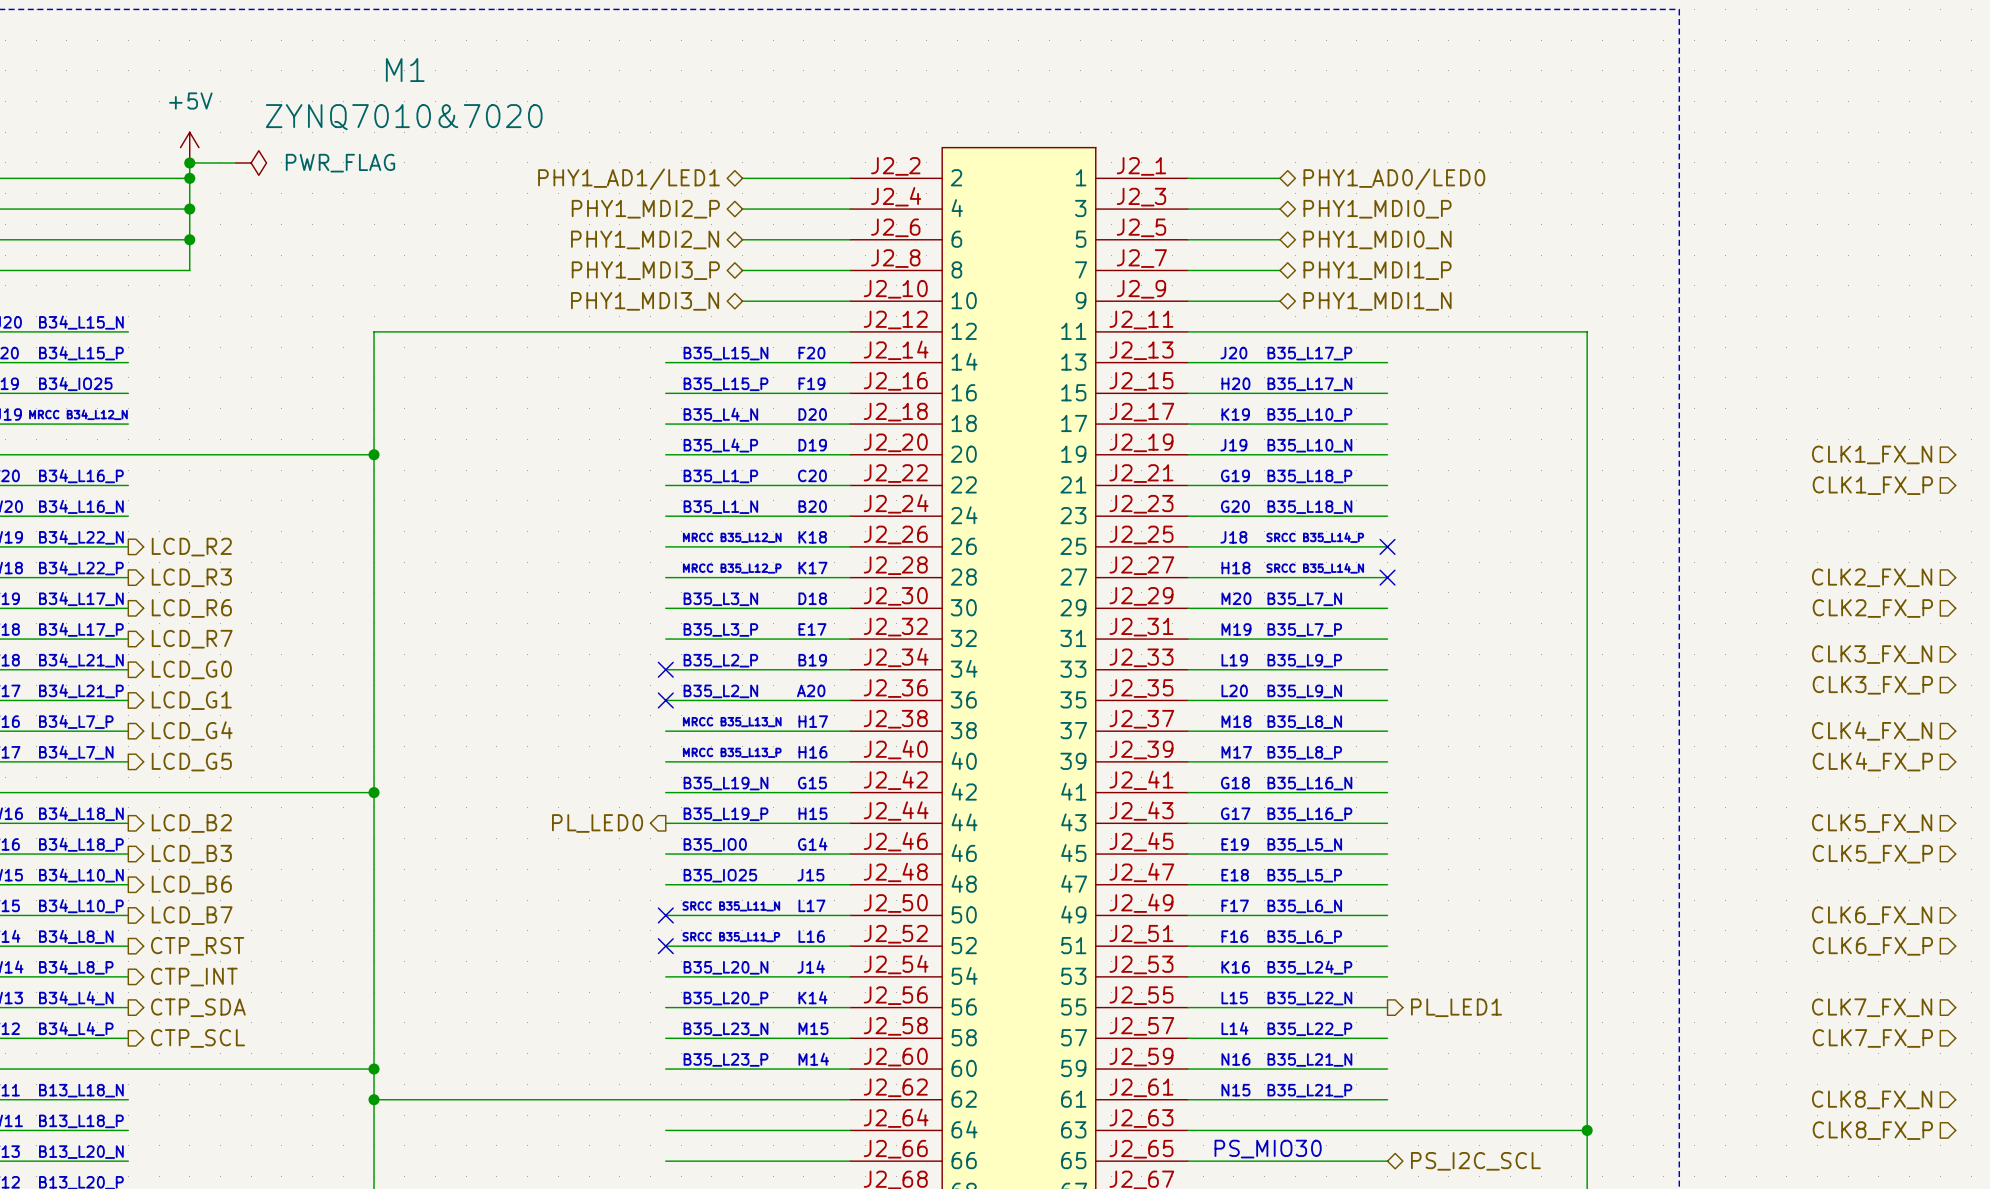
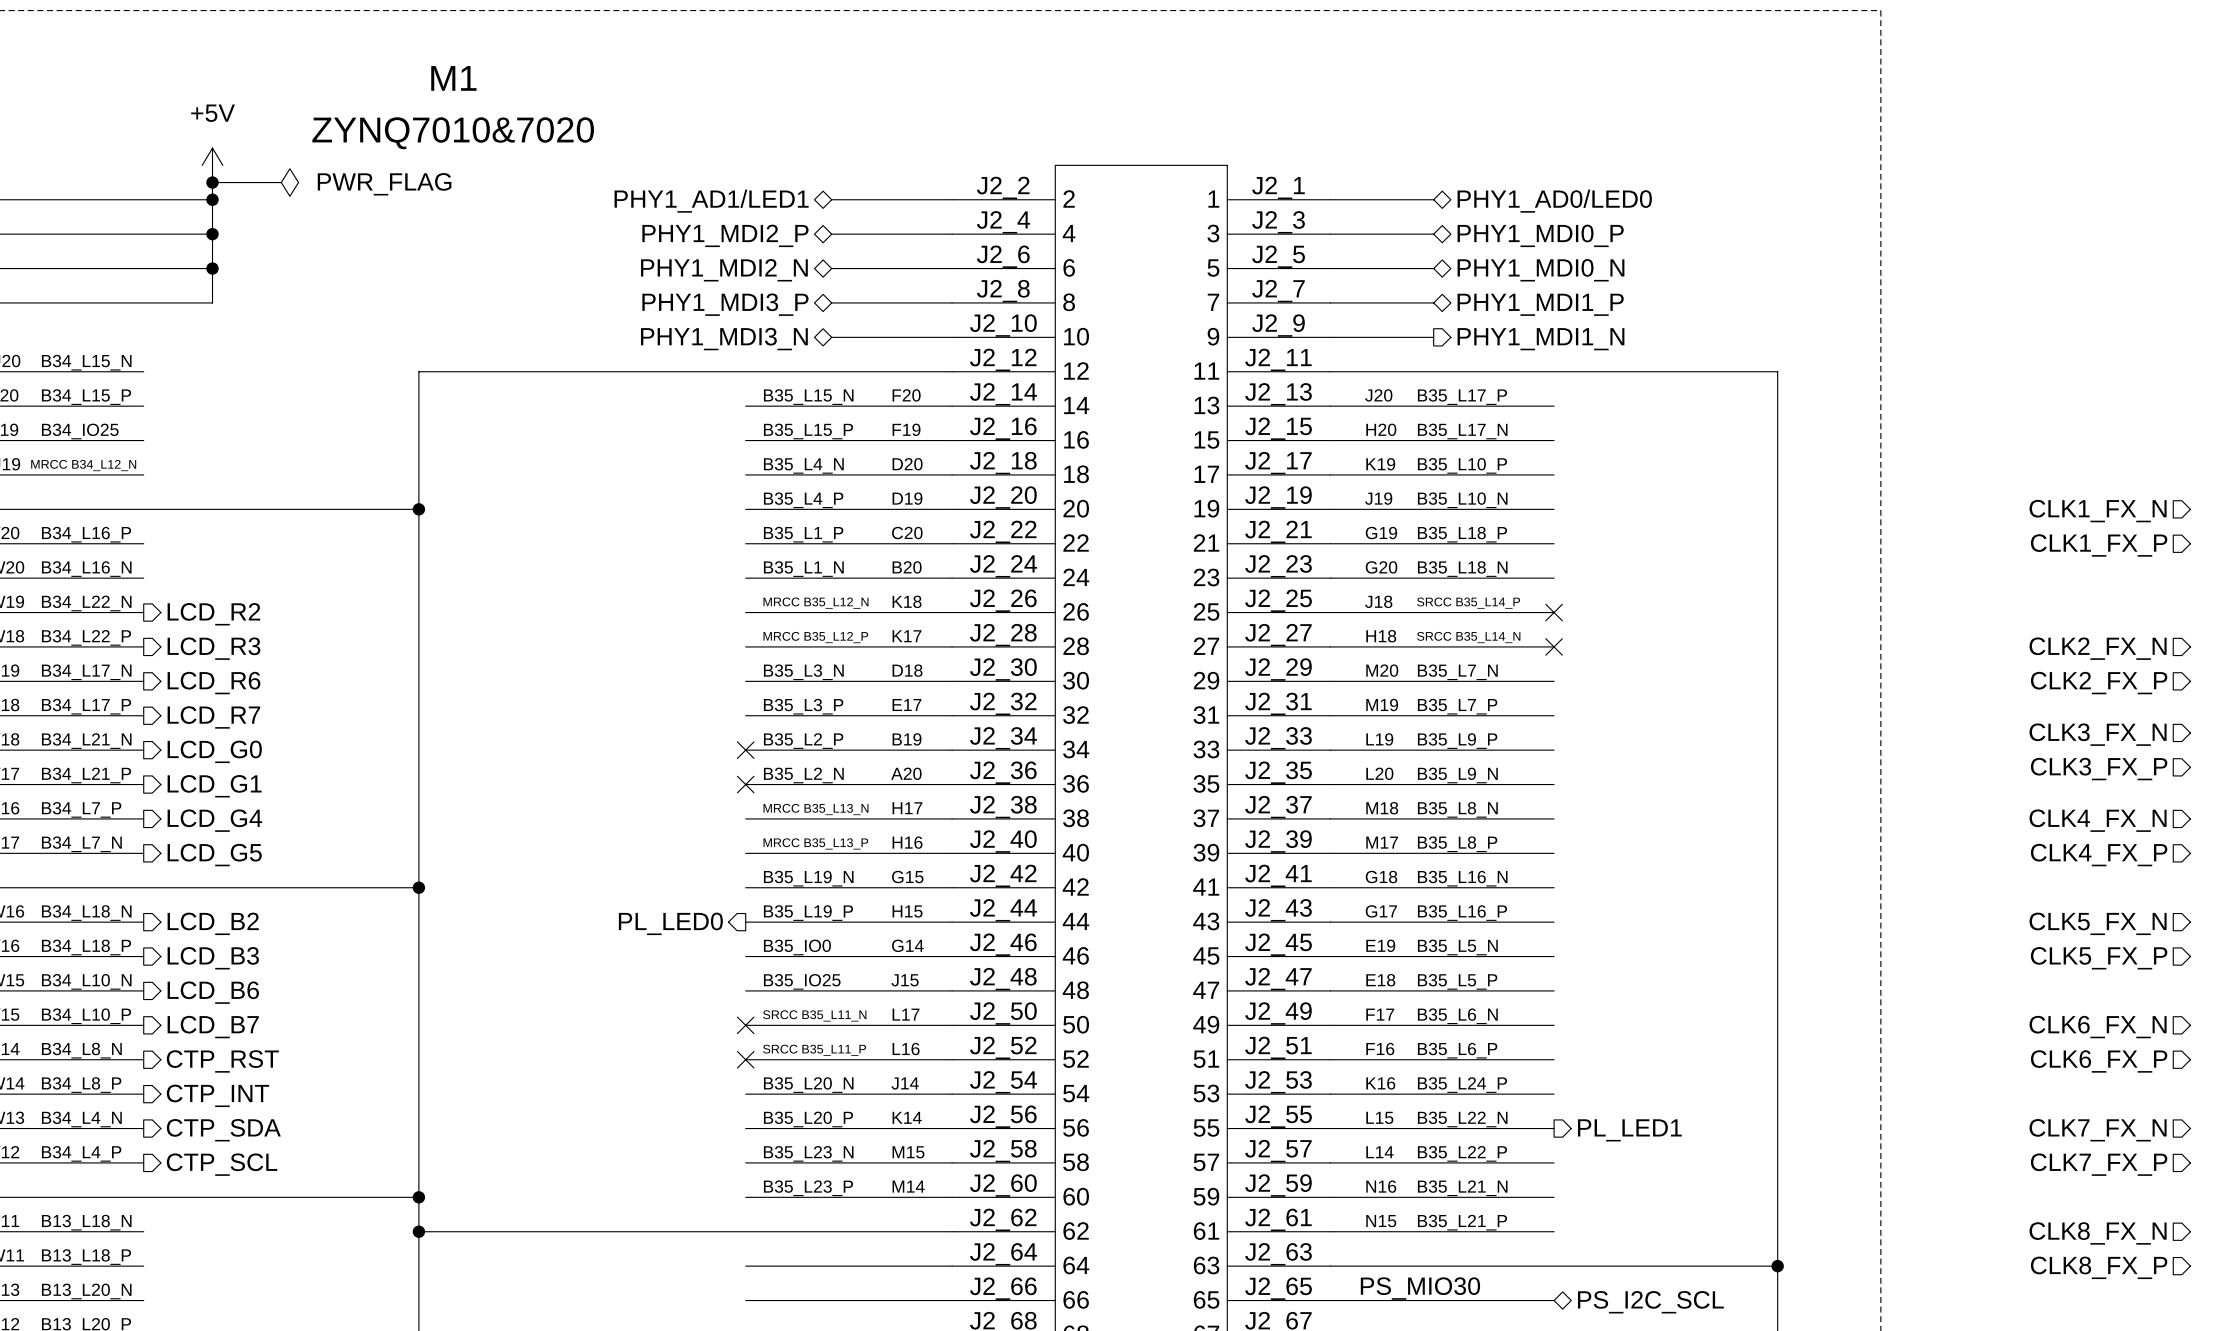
hierarchical label shape: bidirectional (1377, 301) -> output (1540, 339)

